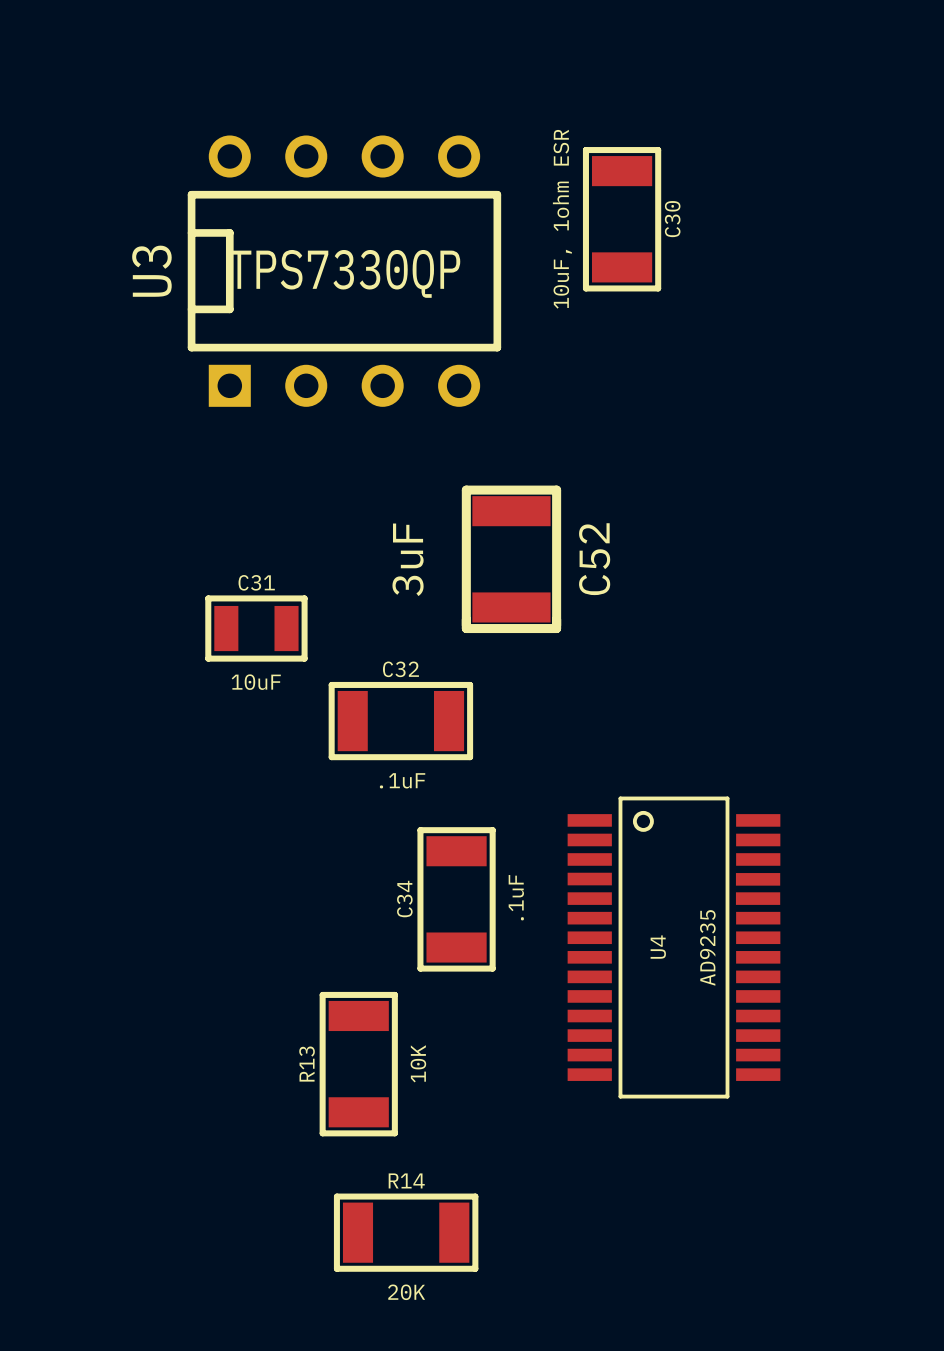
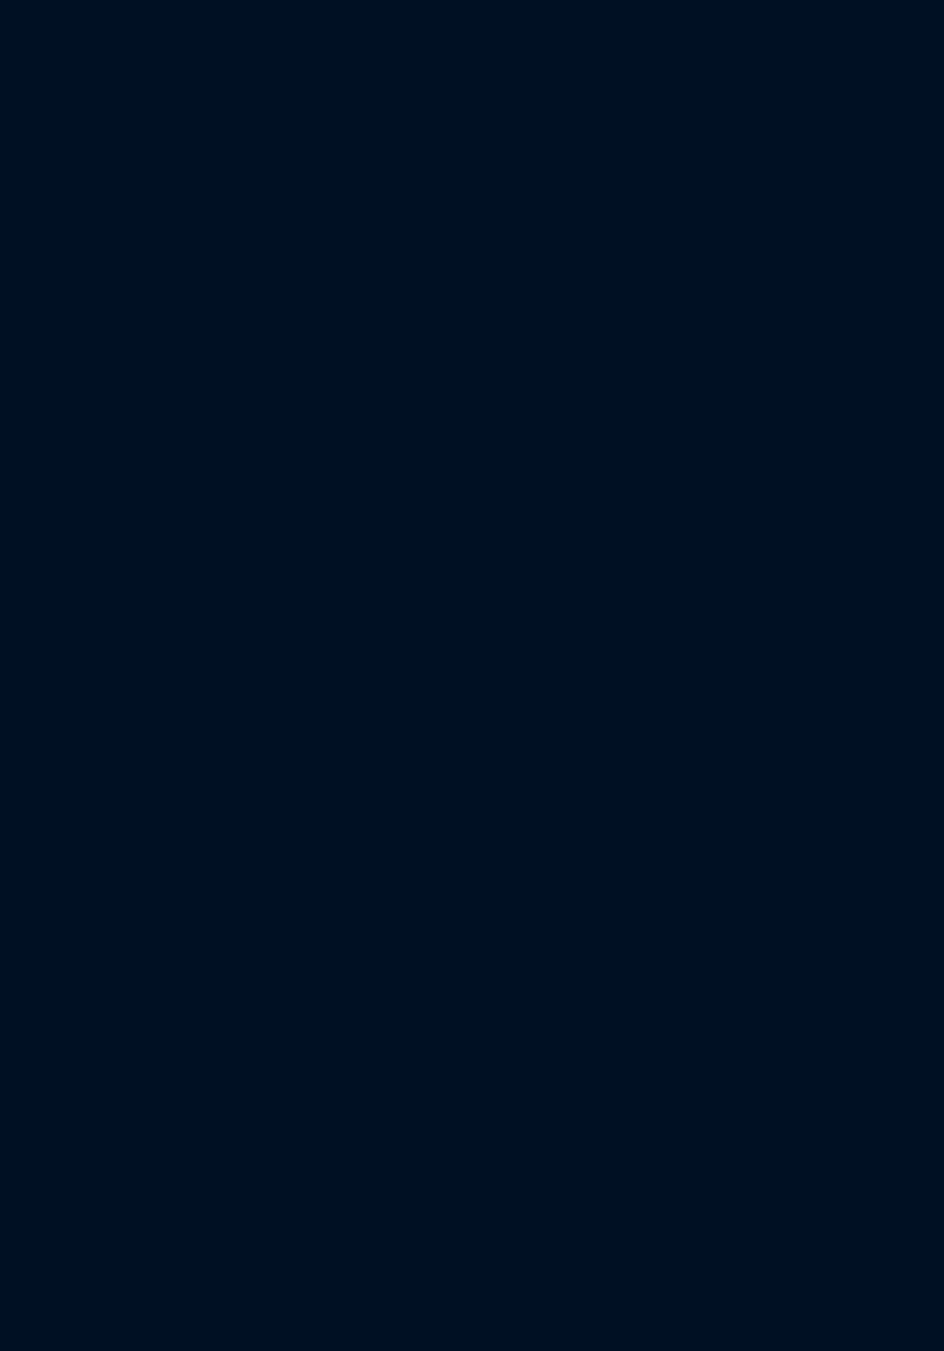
C30: 10uF, 1ohm ESR (622, 219) -> none
U3: TPS7330QP (344, 271) -> none
C52: 3uF (511, 559) -> none
C31: 10uF (256, 628) -> none
C32: .1uF (400, 721) -> none
C34: .1uF (456, 899) -> none
U4: AD9235 (673, 947) -> none
R13: 10K (358, 1064) -> none
R14: 20K (406, 1232) -> none

